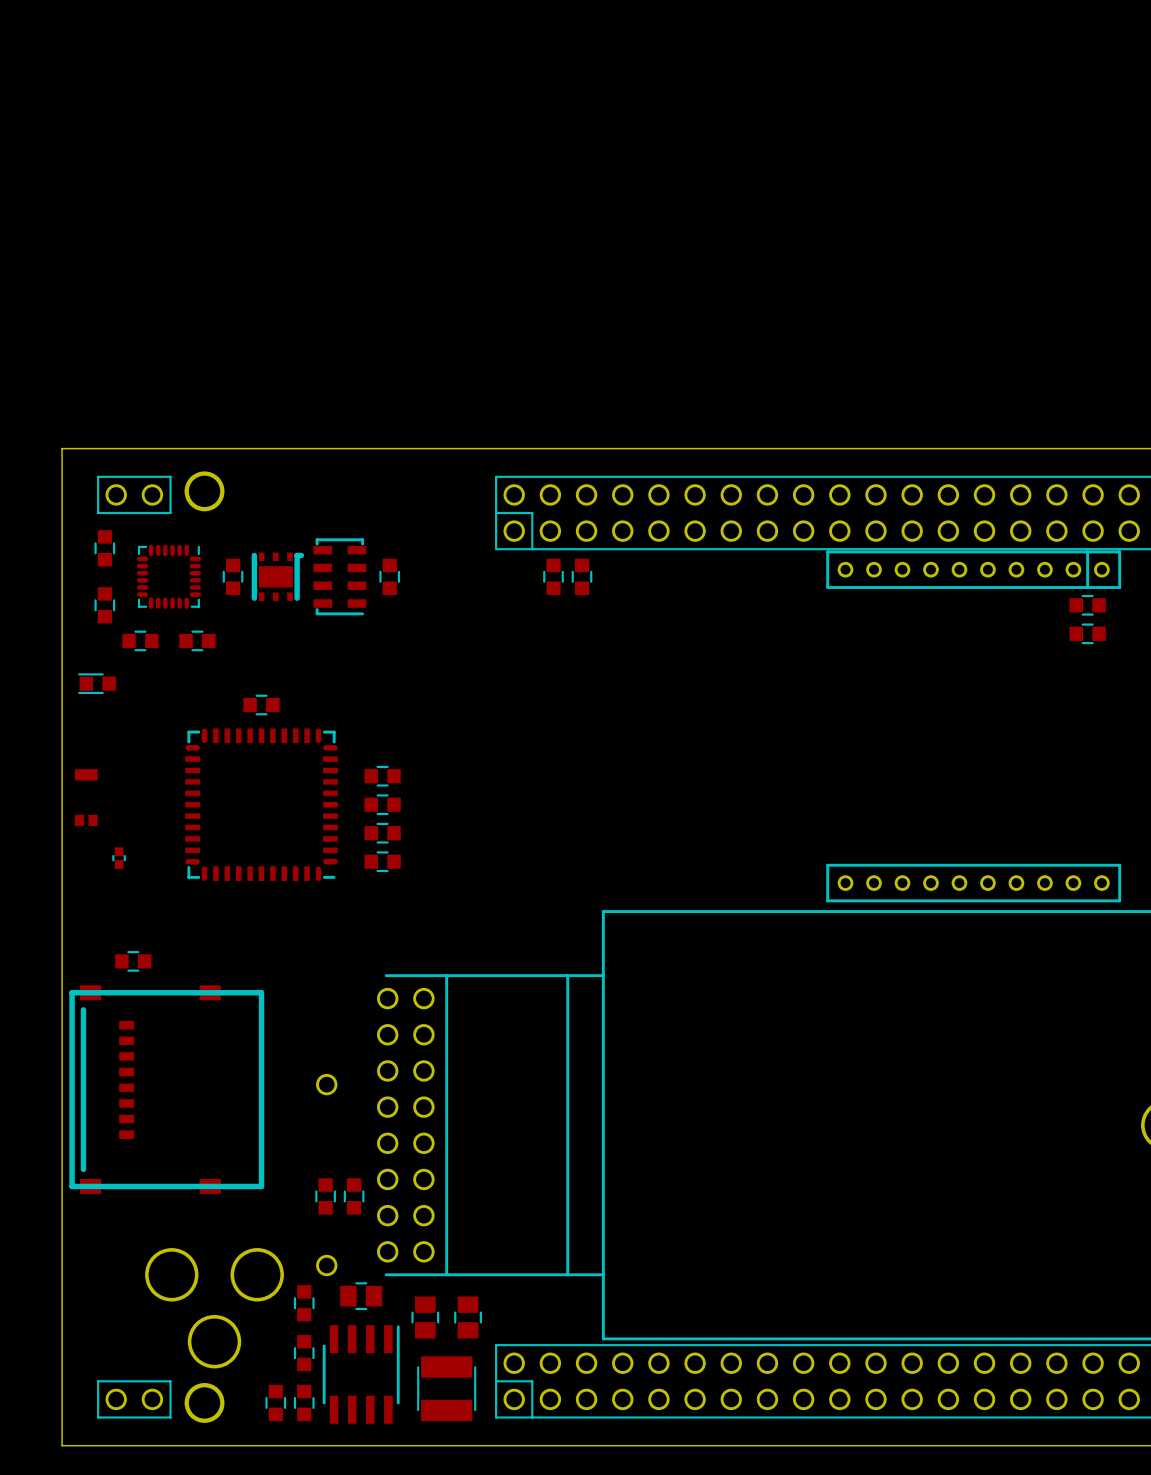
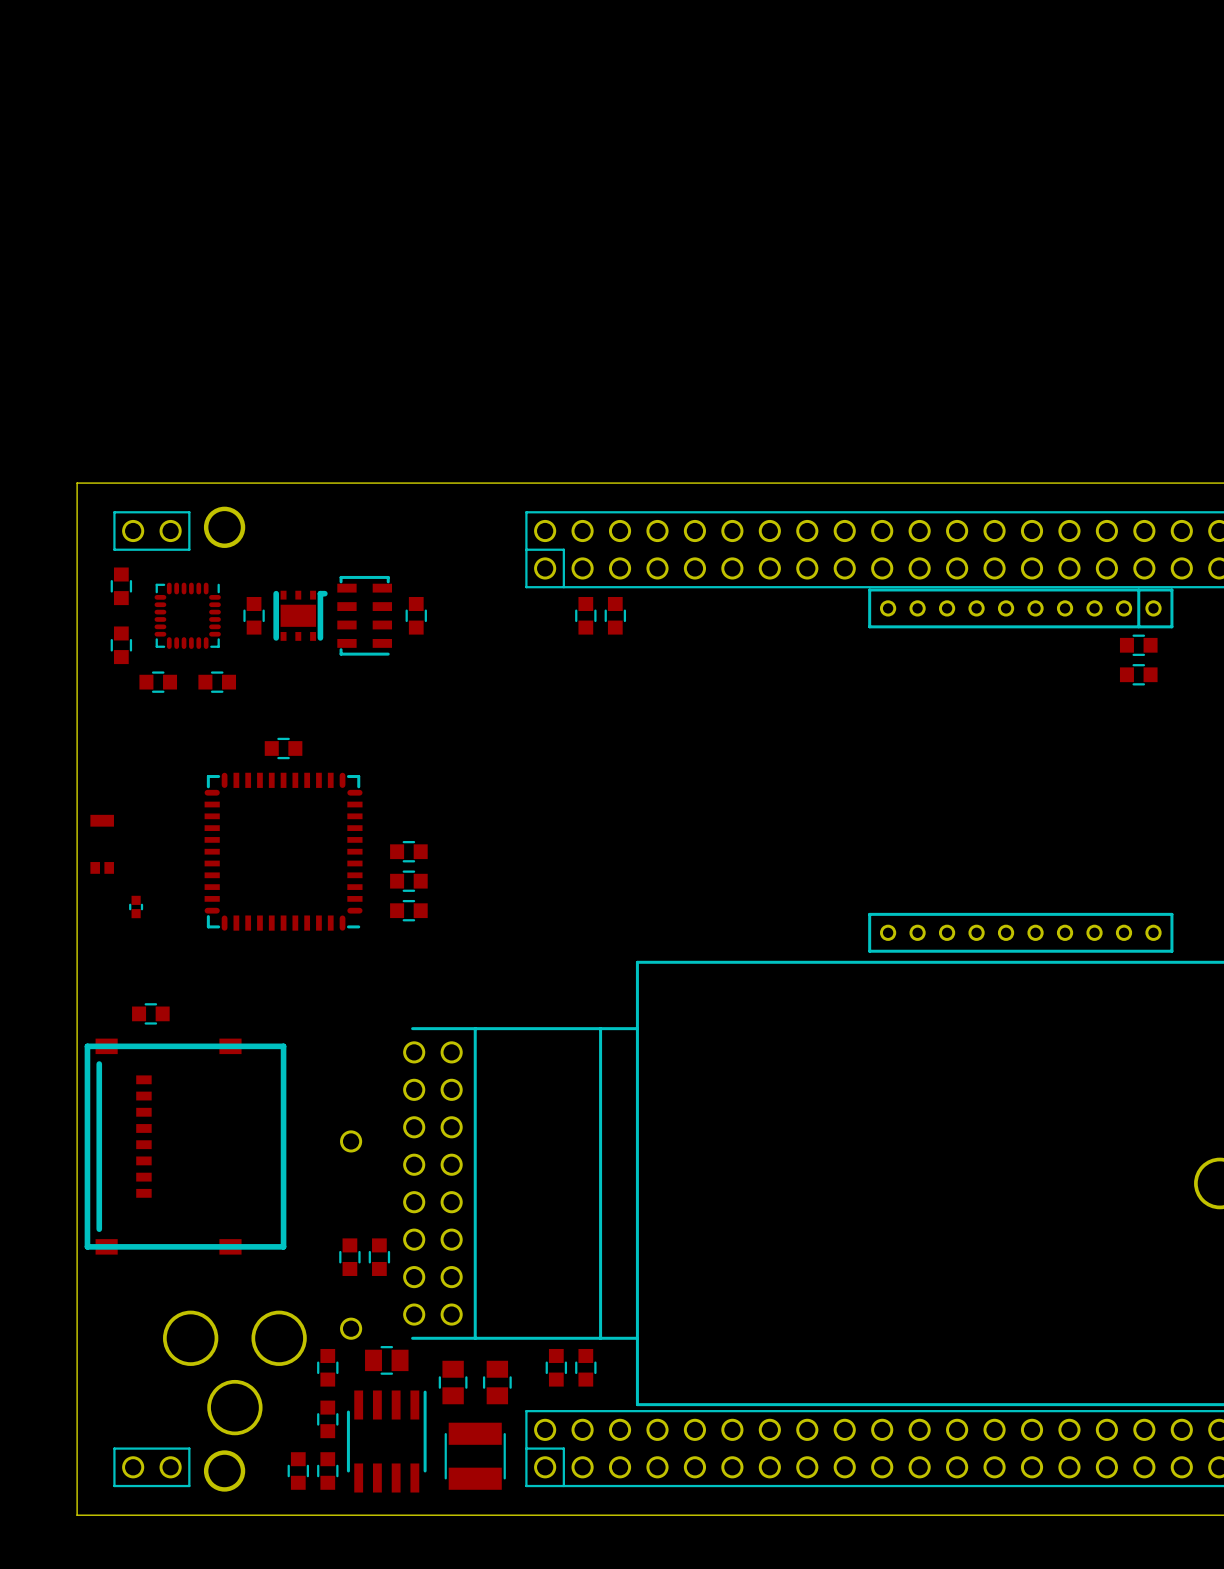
part: (96, 683) -> none
part: (382, 776) -> none
part: none -> (556, 1367)
part: none -> (585, 1367)

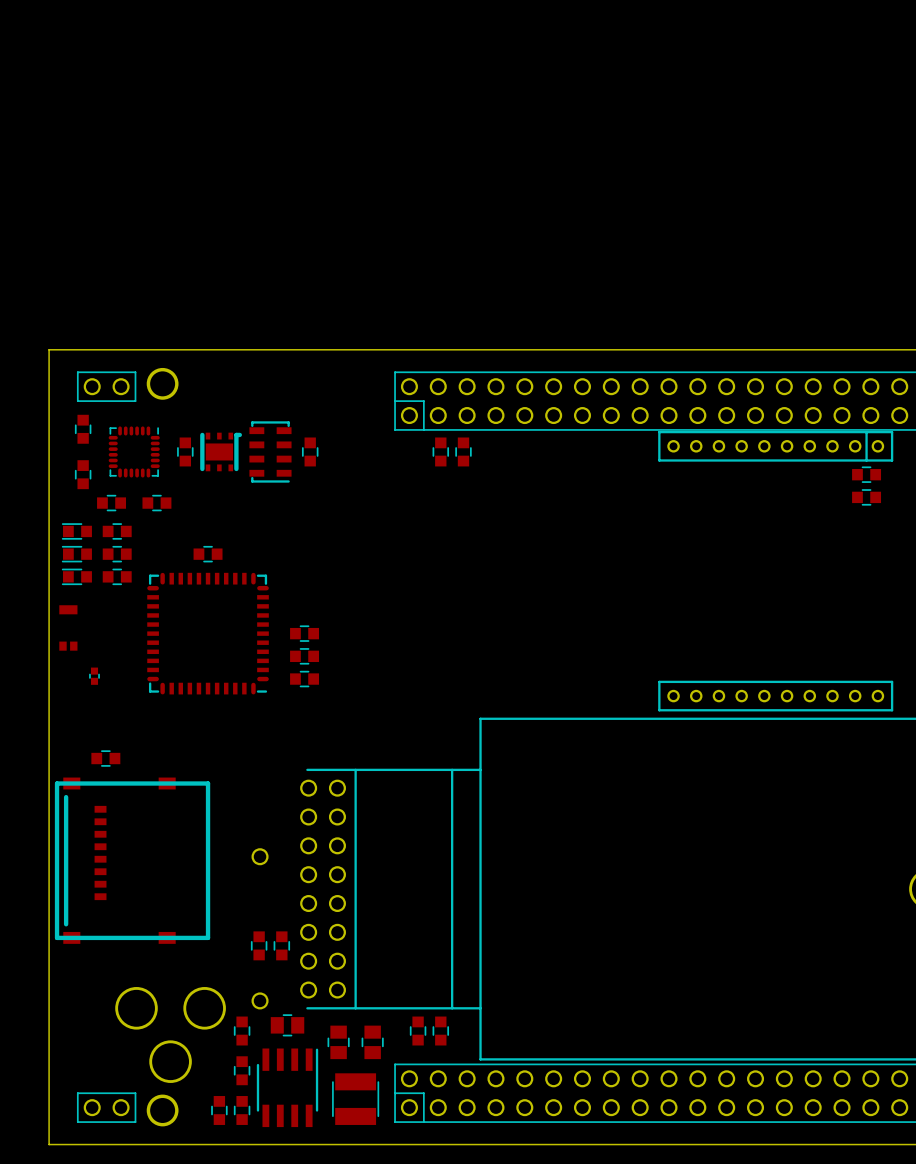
part: none -> (76, 531)
part: none -> (117, 531)
part: none -> (76, 554)
part: none -> (117, 554)
part: none -> (76, 576)
part: none -> (117, 576)

